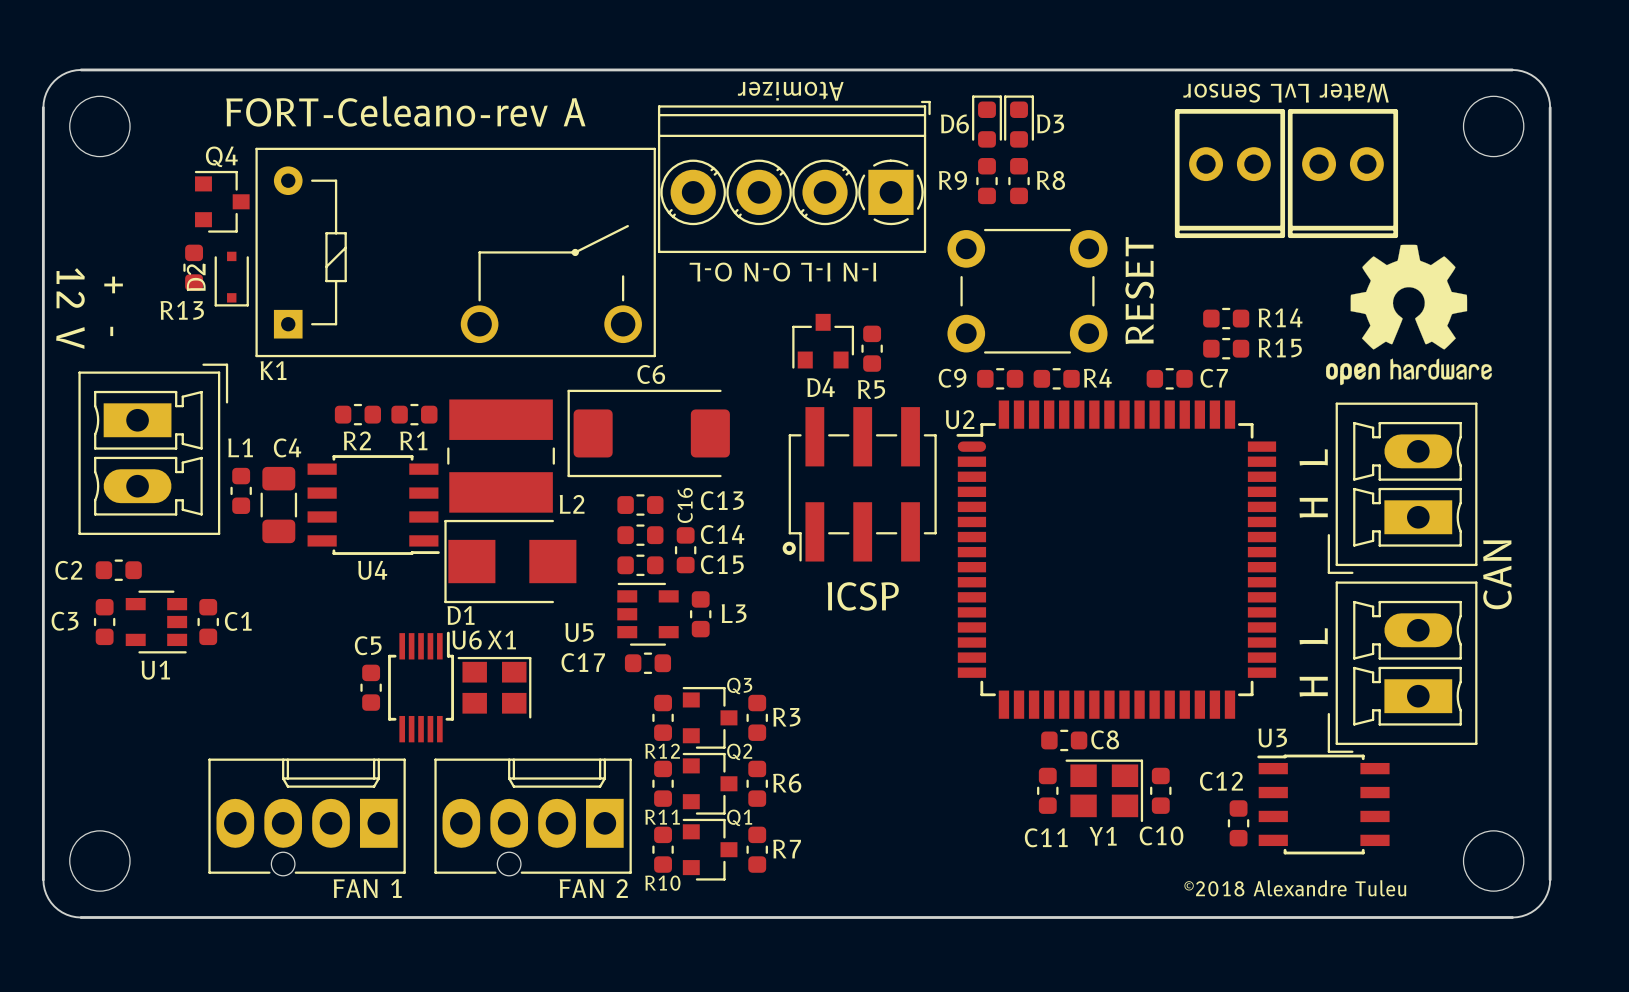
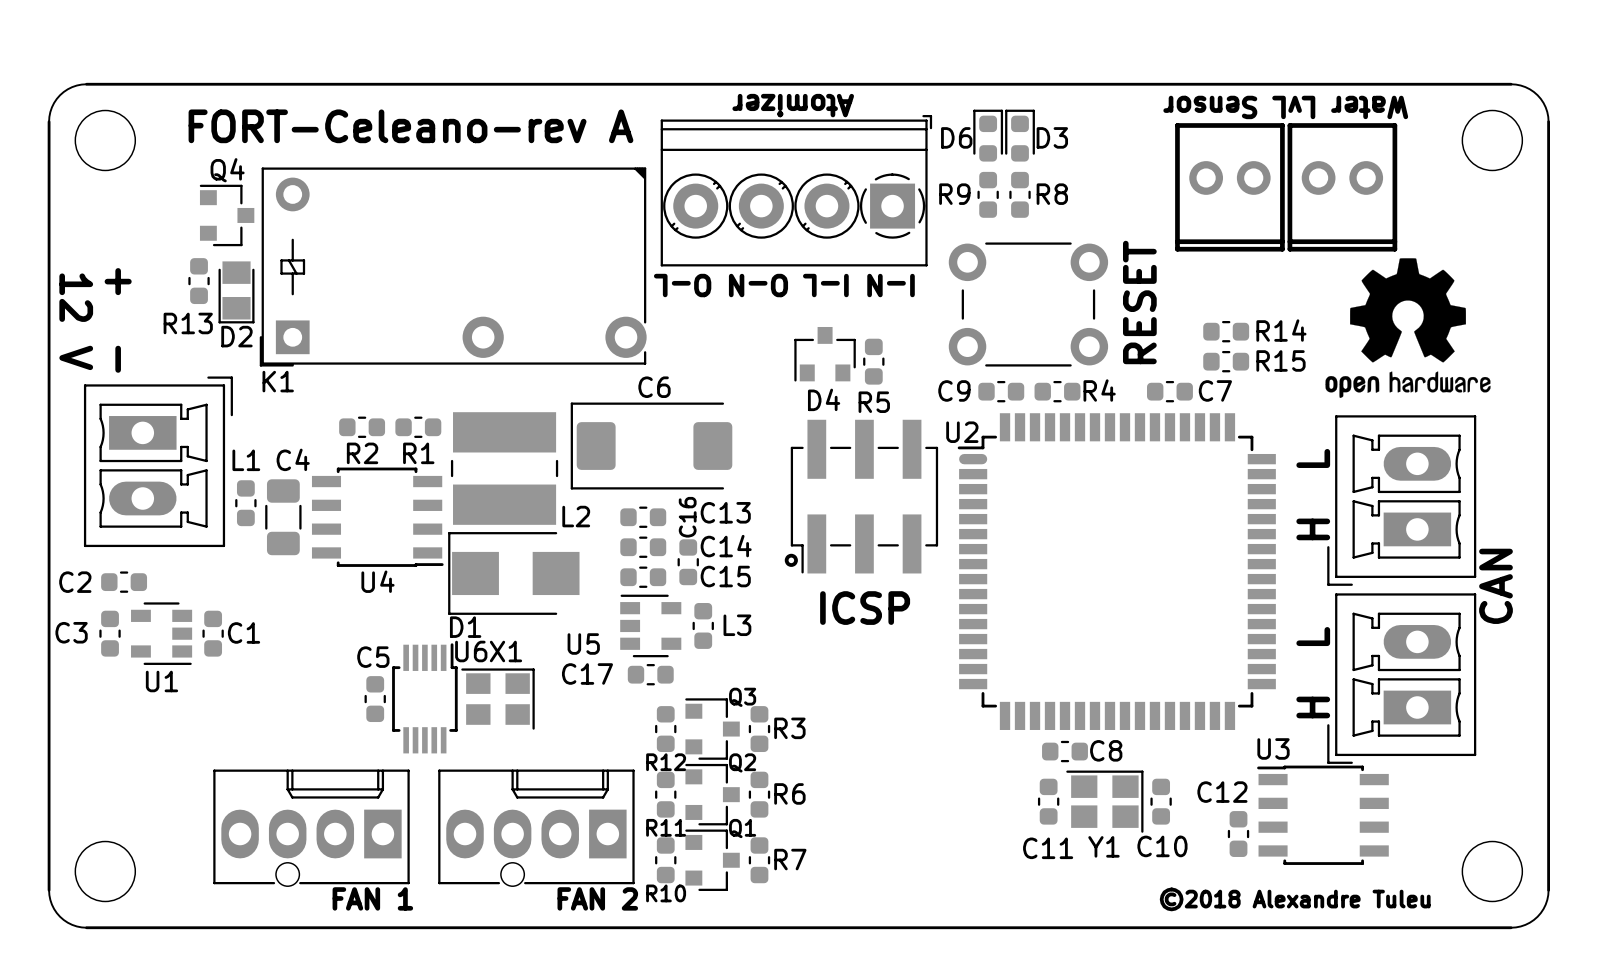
K1 footprint: [255, 147, 656, 358] -> [259, 167, 647, 367]
D2 footprint: [214, 251, 249, 307] -> [218, 261, 255, 324]
D2 name rotation: 0° (196, 277) -> 90° clockwise (236, 336)
D2 name position: D2 (196, 277) -> D2 (236, 336)

